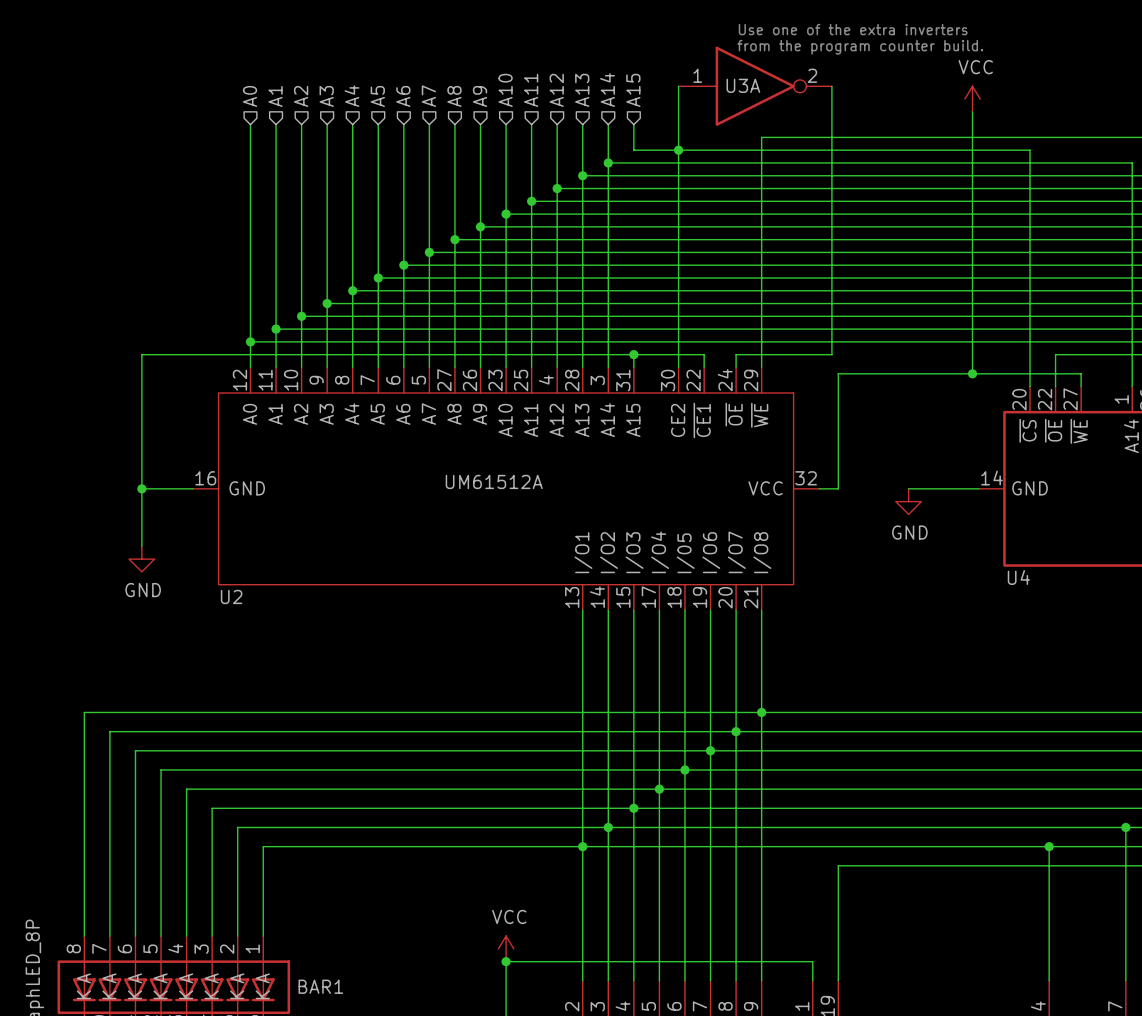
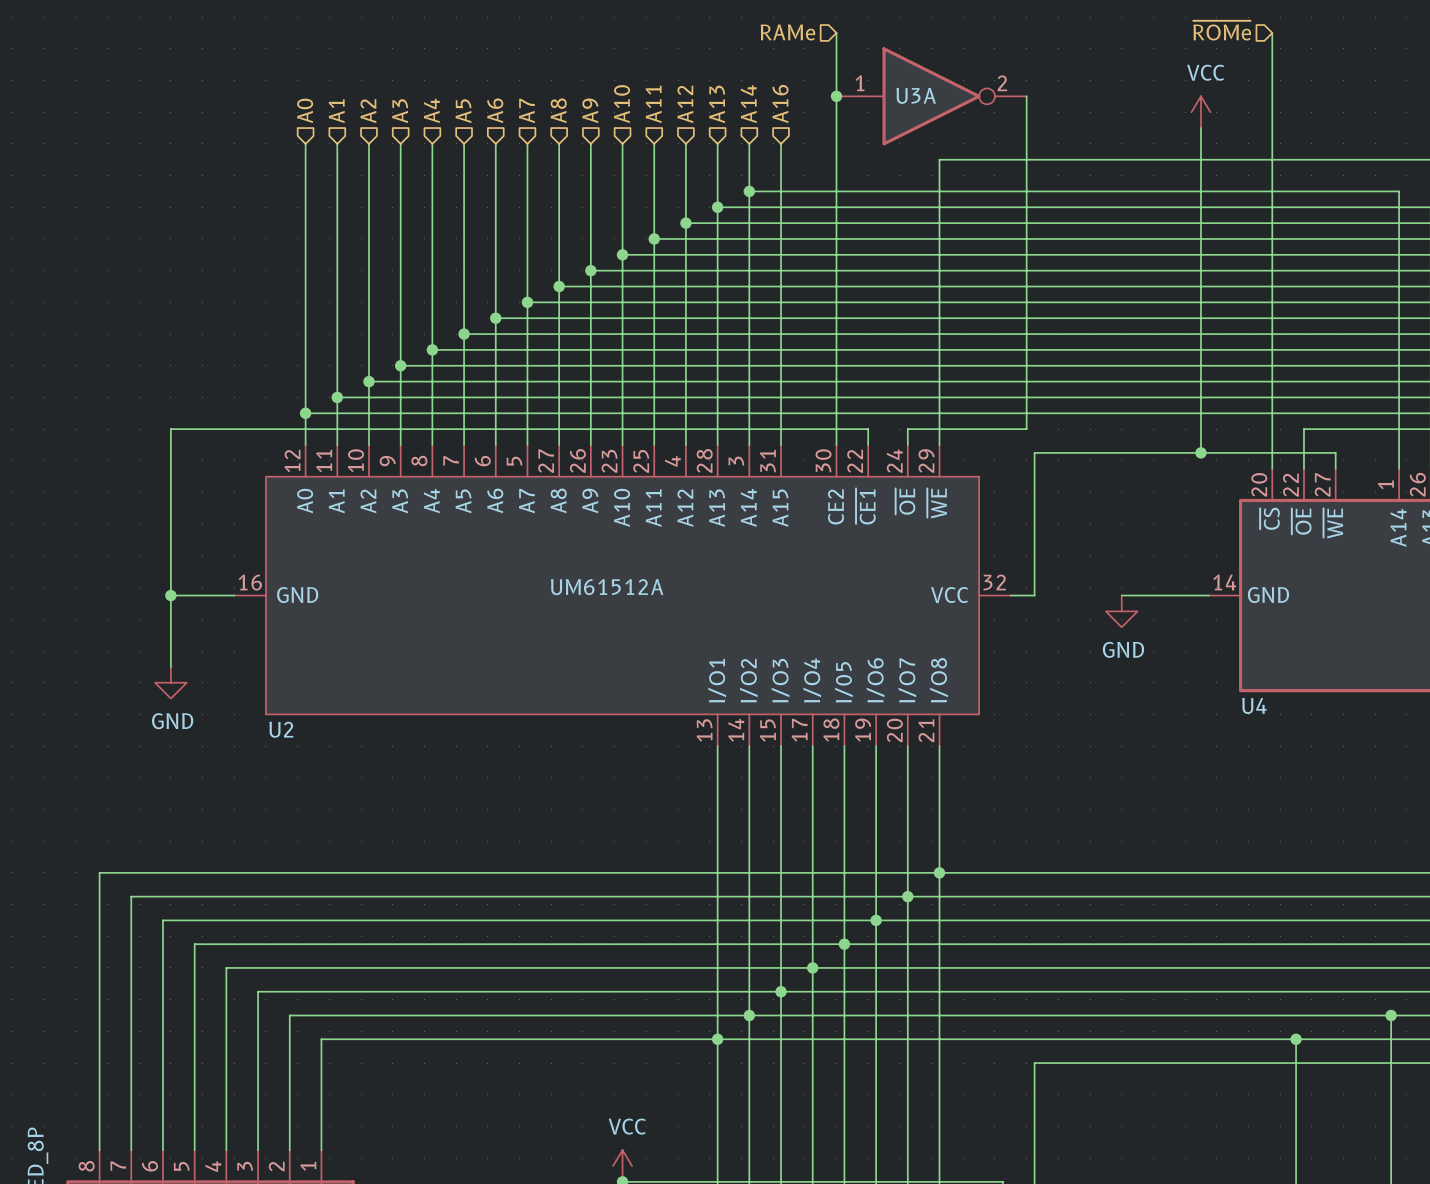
text: Use one of the extra inverters (853, 29) -> none
hierarchical label: none -> ~{ROMe} (1222, 30)
hierarchical label: none -> RAMe (787, 32)
wire: none -> (836, 32) (836, 96)
text: from the program counter build. (860, 47) -> none
junction: none -> (836, 96)
hierarchical label: A15 (633, 90) -> A16 (780, 104)
wire: (633, 150) (1030, 150) -> (1272, 32) (1272, 175)
wire: none -> (781, 175) (781, 429)
junction: (678, 150) -> none
junction: (633, 354) -> none

